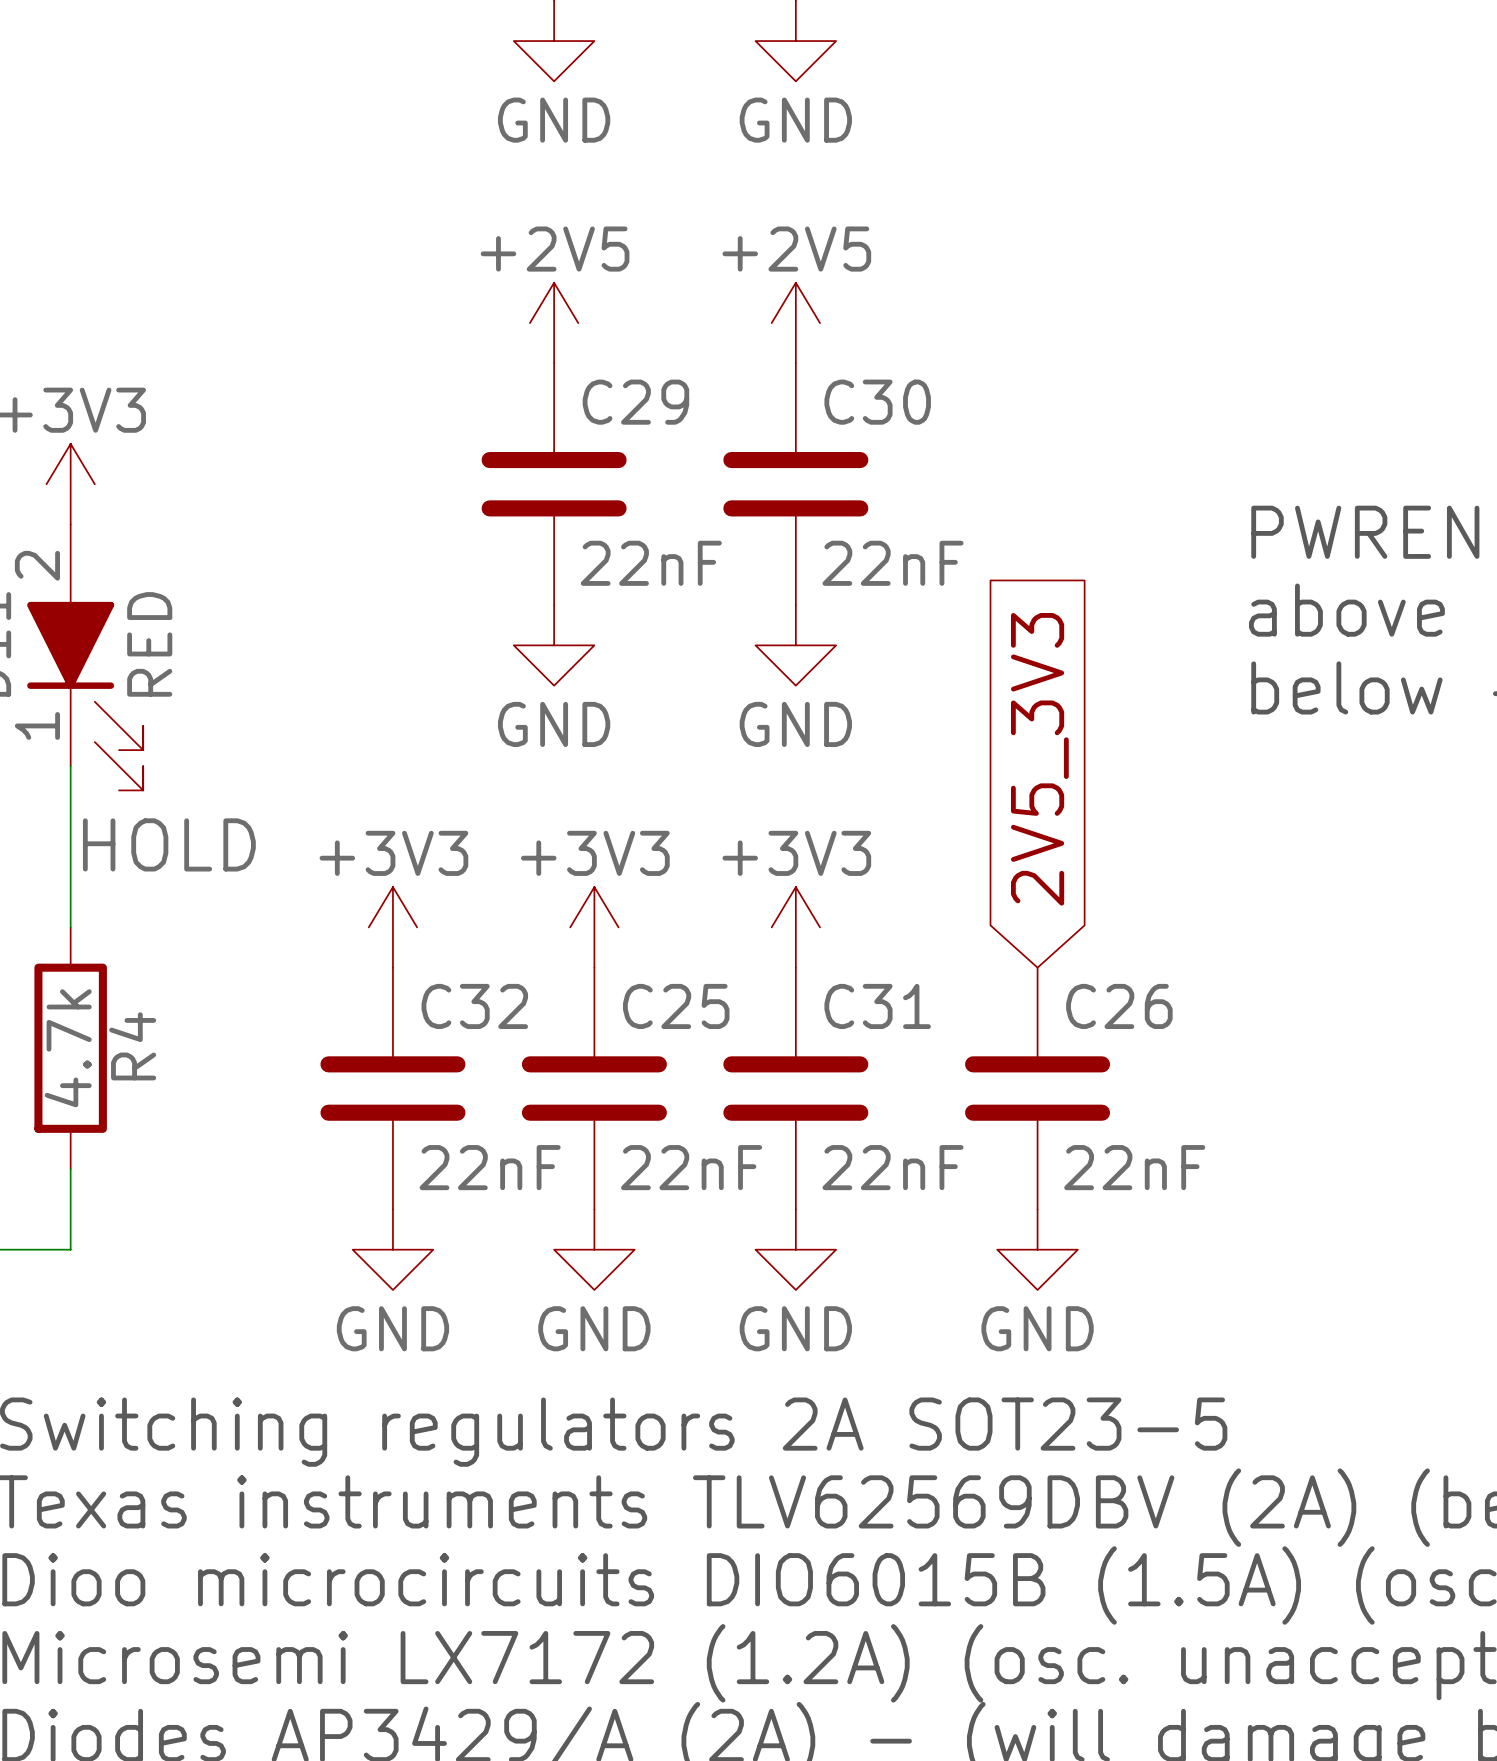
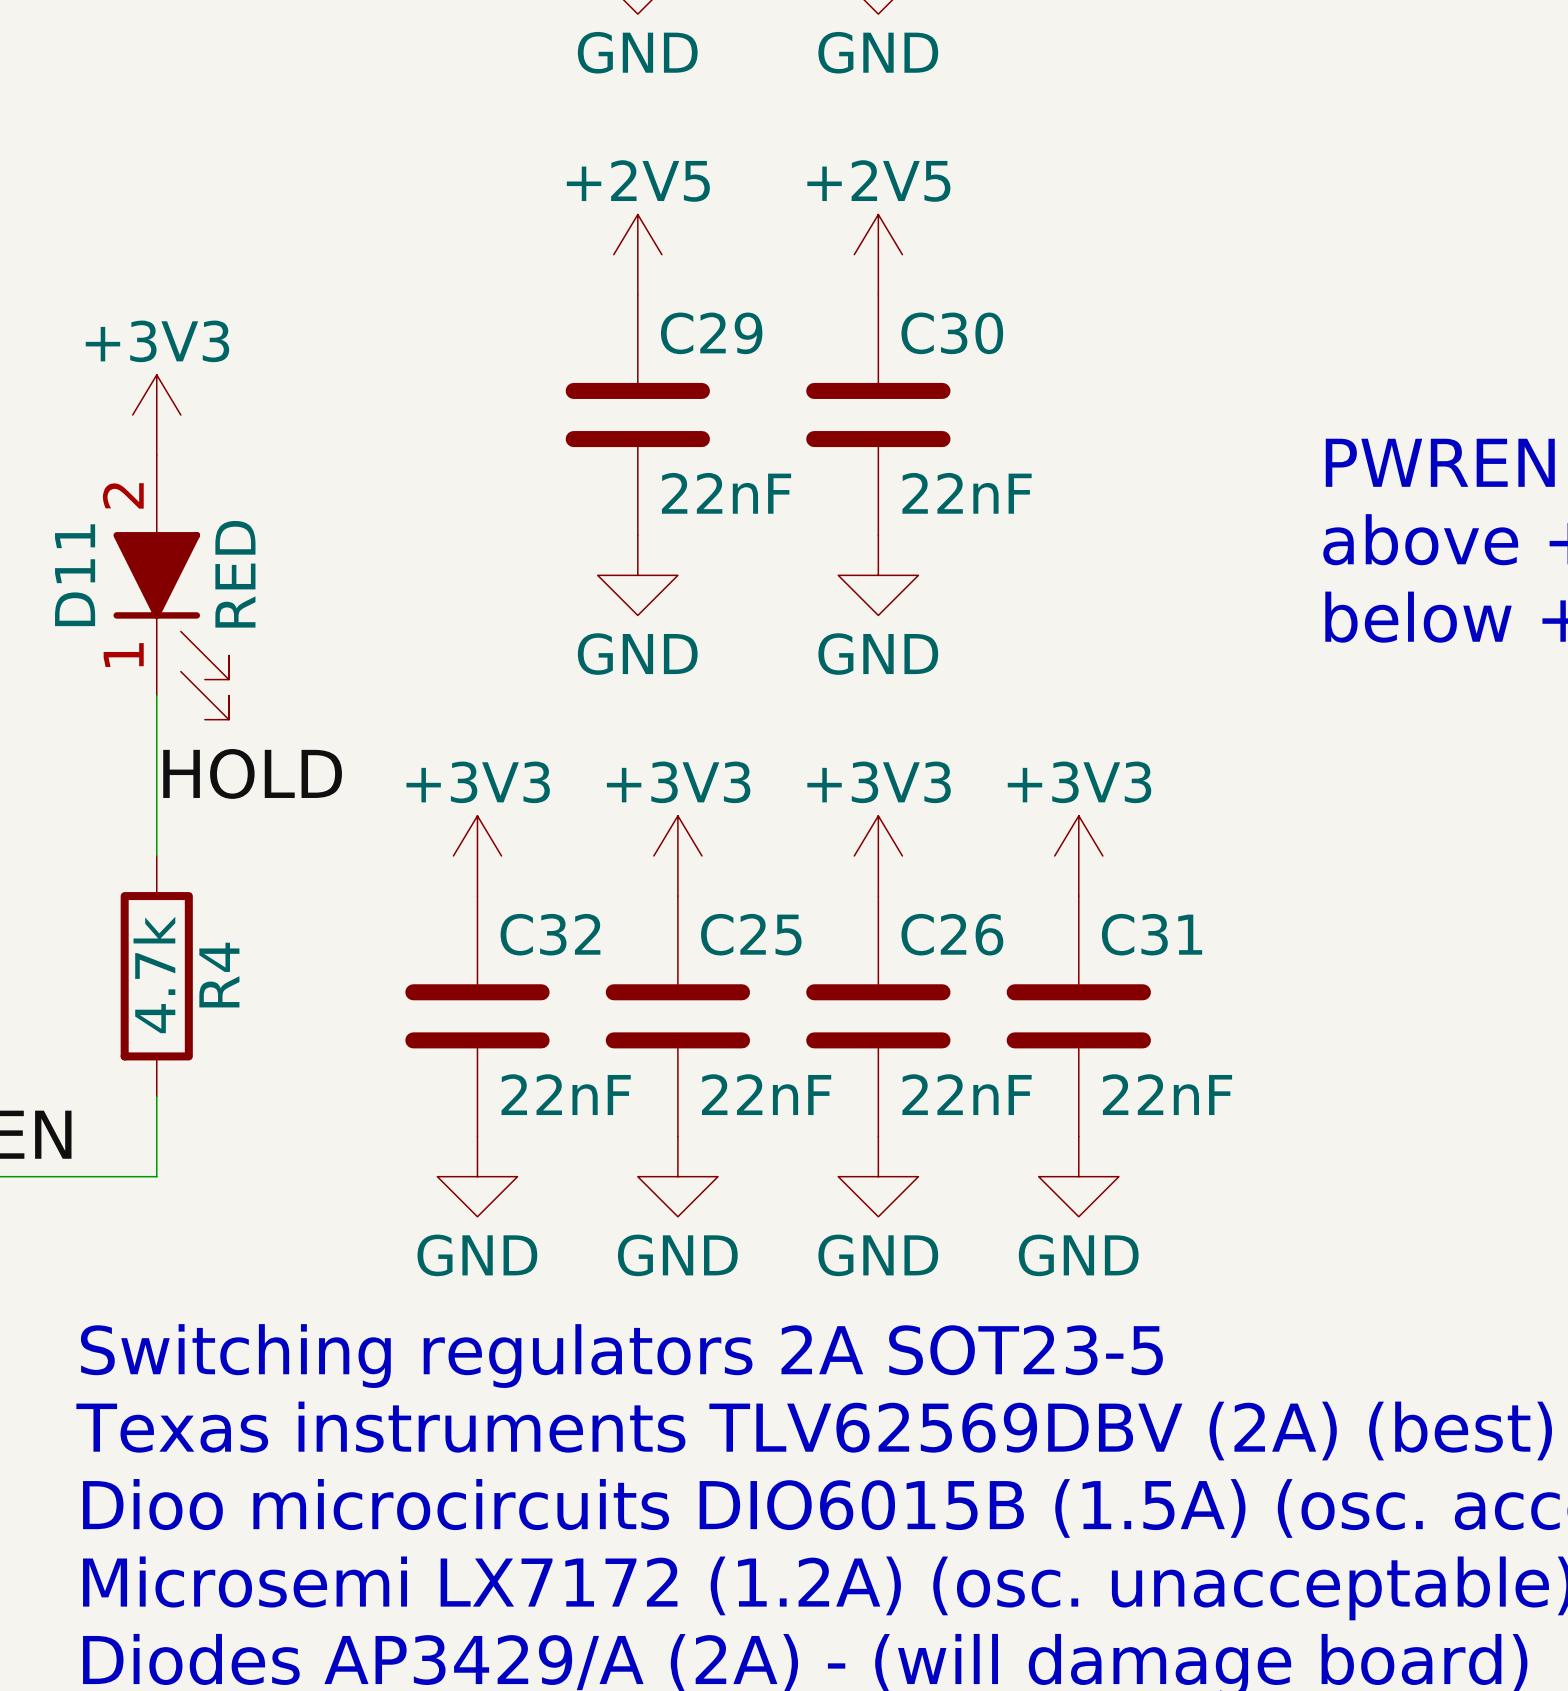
global label: 2V5_3V3 (1039, 759) -> none
power symbol: none -> +3V3 (1078, 855)
C31 name: C31 (877, 1006) -> C26 (952, 934)
C31: none -> 22nF (1078, 1016)
C26: 22nF (1037, 1088) -> none
power symbol position: GND (1037, 1249) -> GND (1078, 1176)

